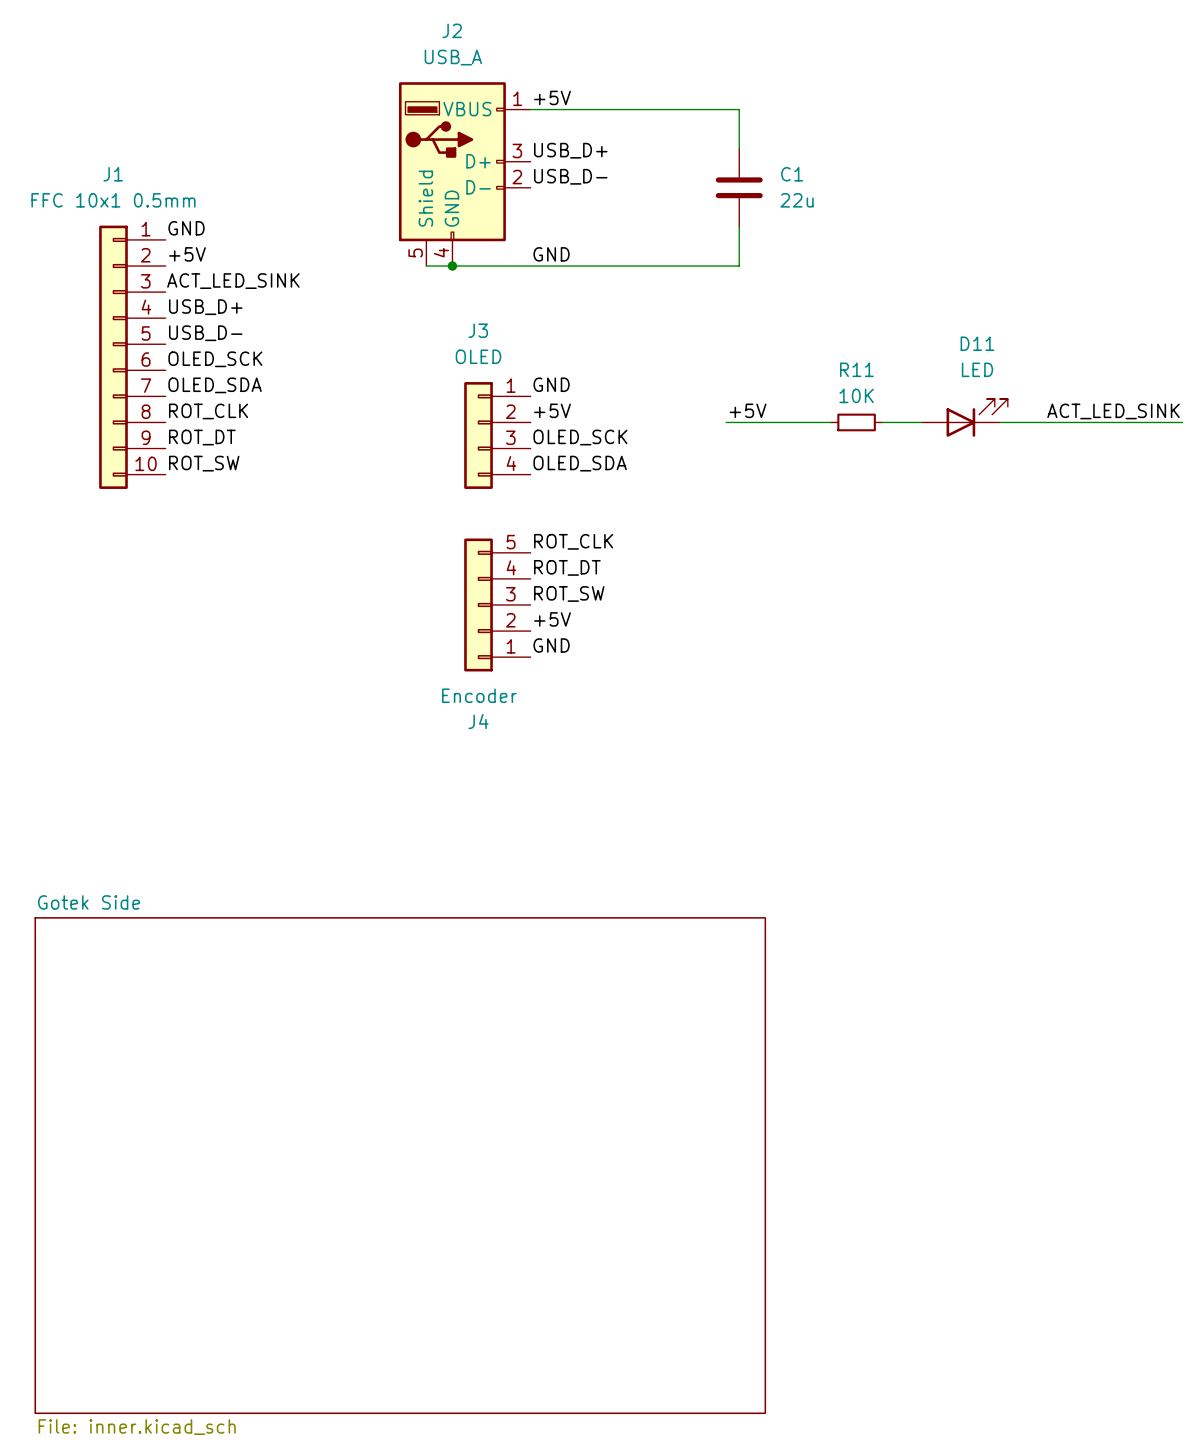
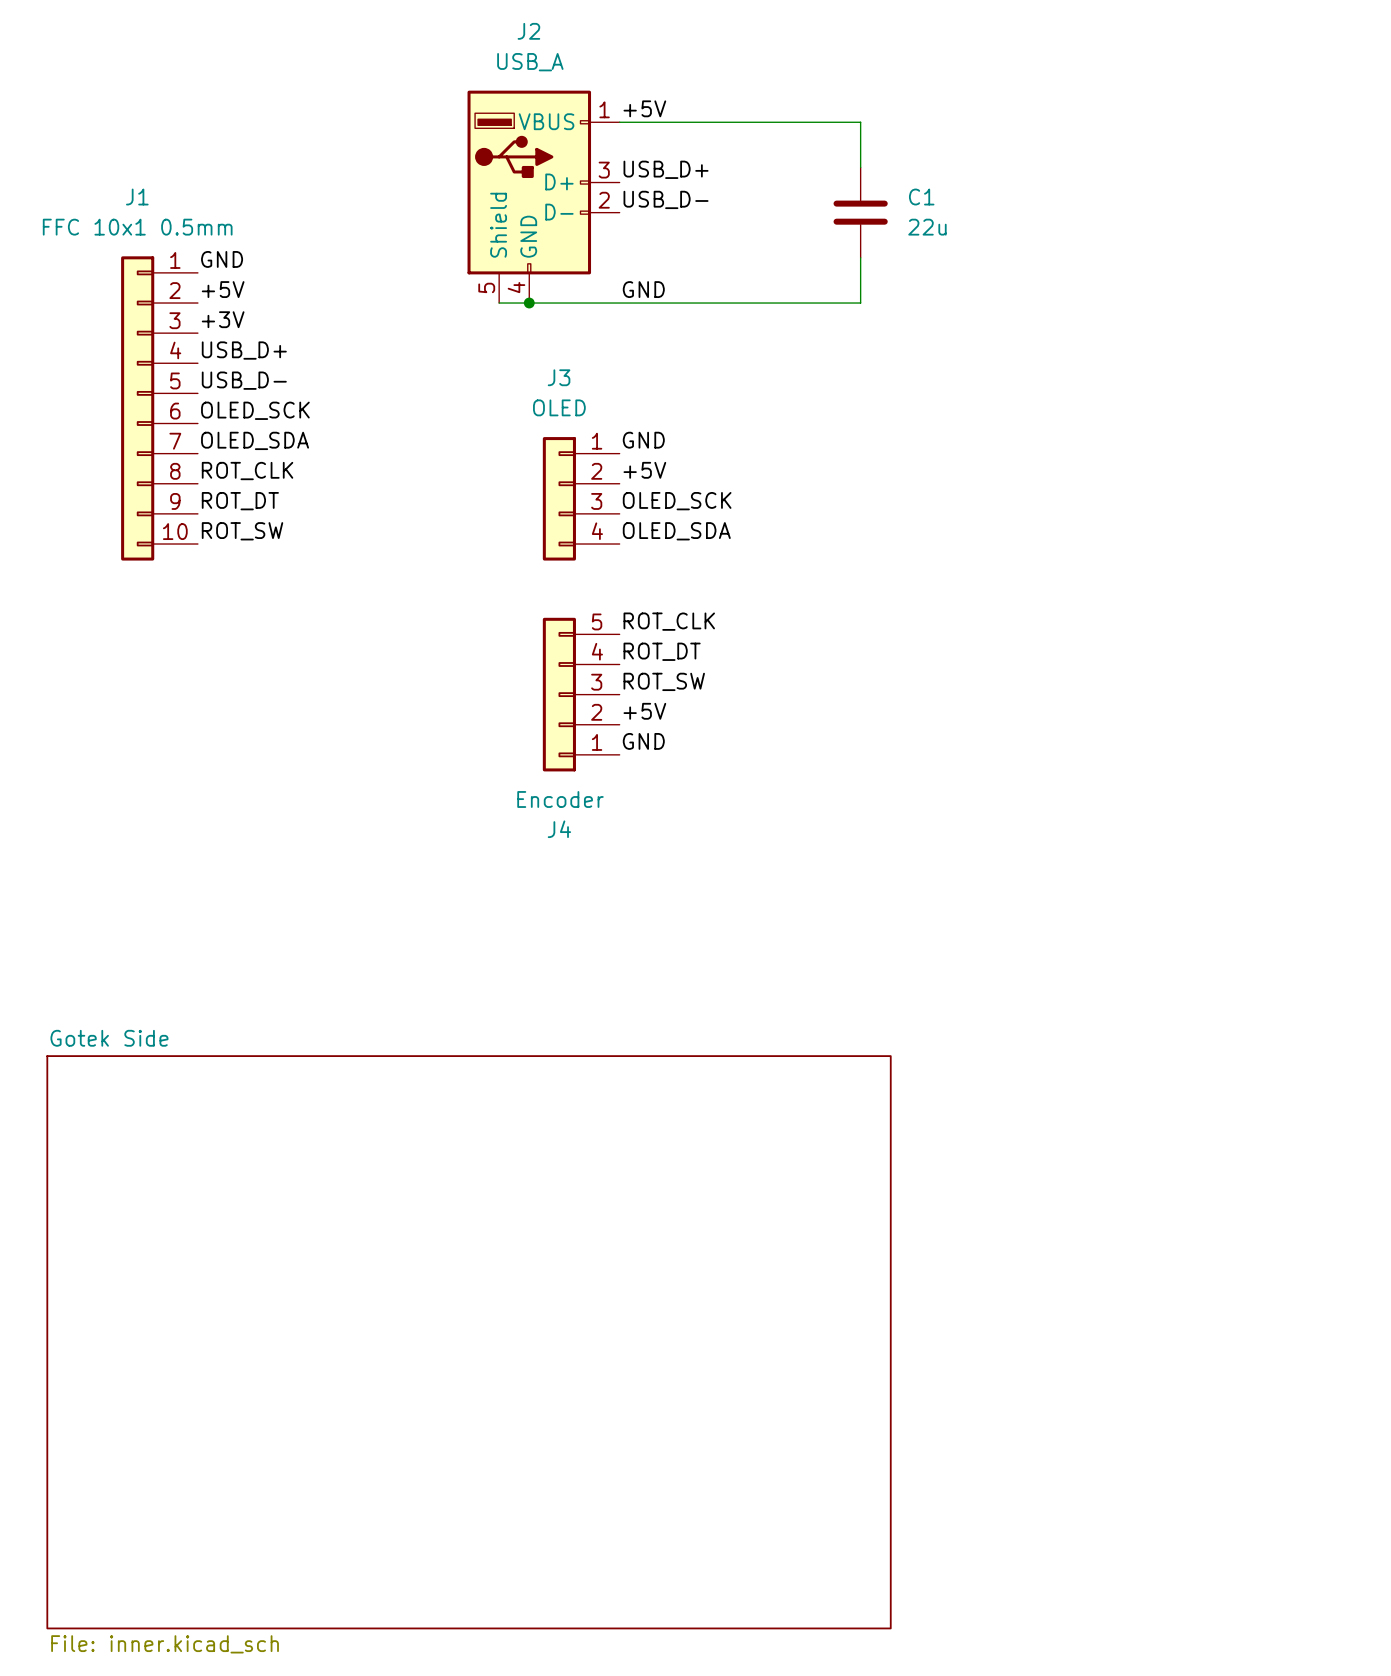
label: ACT_LED_SINK (233, 281) -> +3V (223, 319)
label: +5V (748, 410) -> none
label: ACT_LED_SINK (1113, 411) -> none
D11: LED (964, 417) -> none
wire: (726, 422) (830, 422) -> none
R11: 10K (856, 422) -> none
wire: (882, 422) (921, 422) -> none
wire: (1000, 422) (1182, 422) -> none

